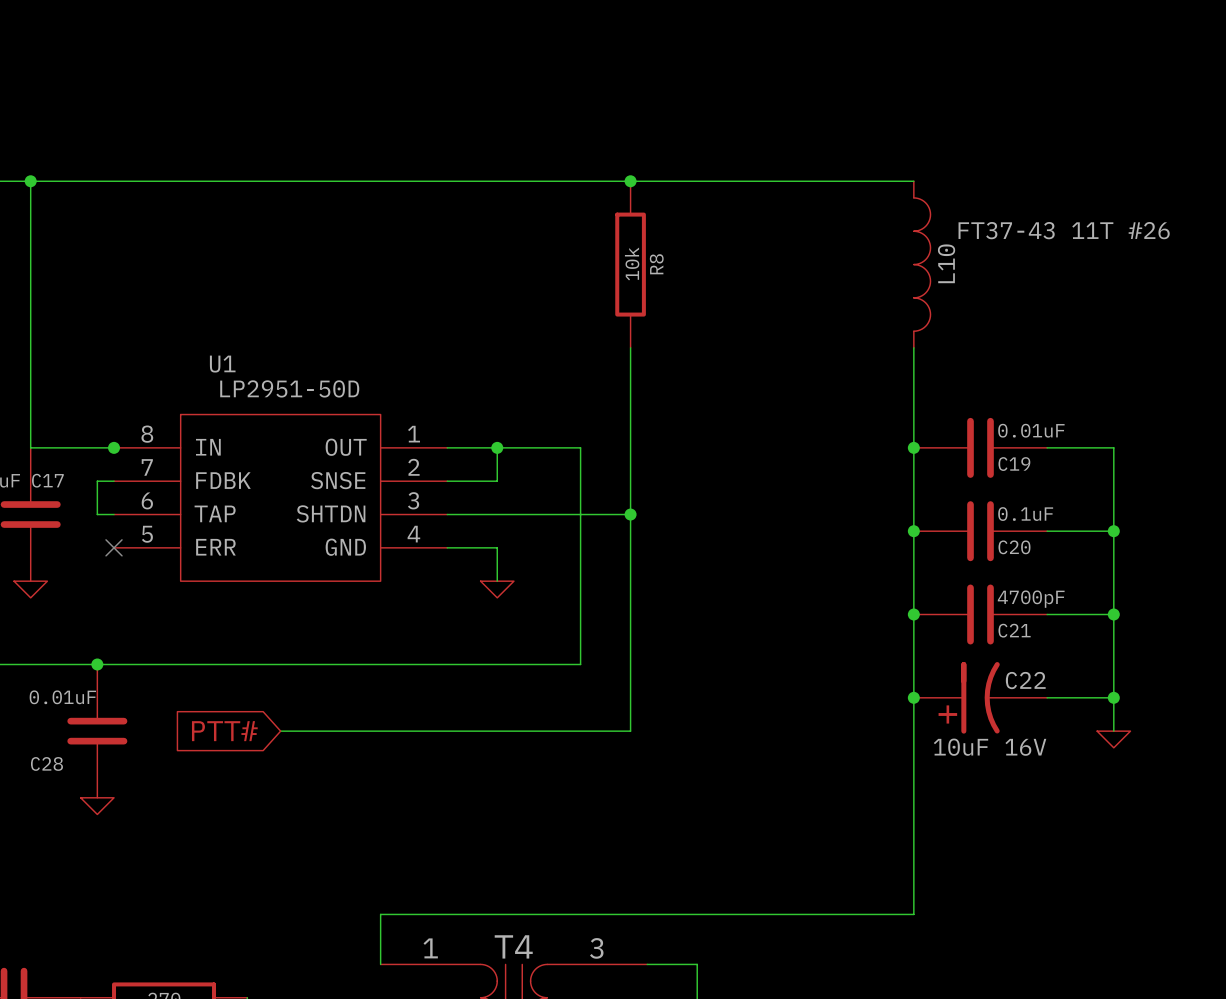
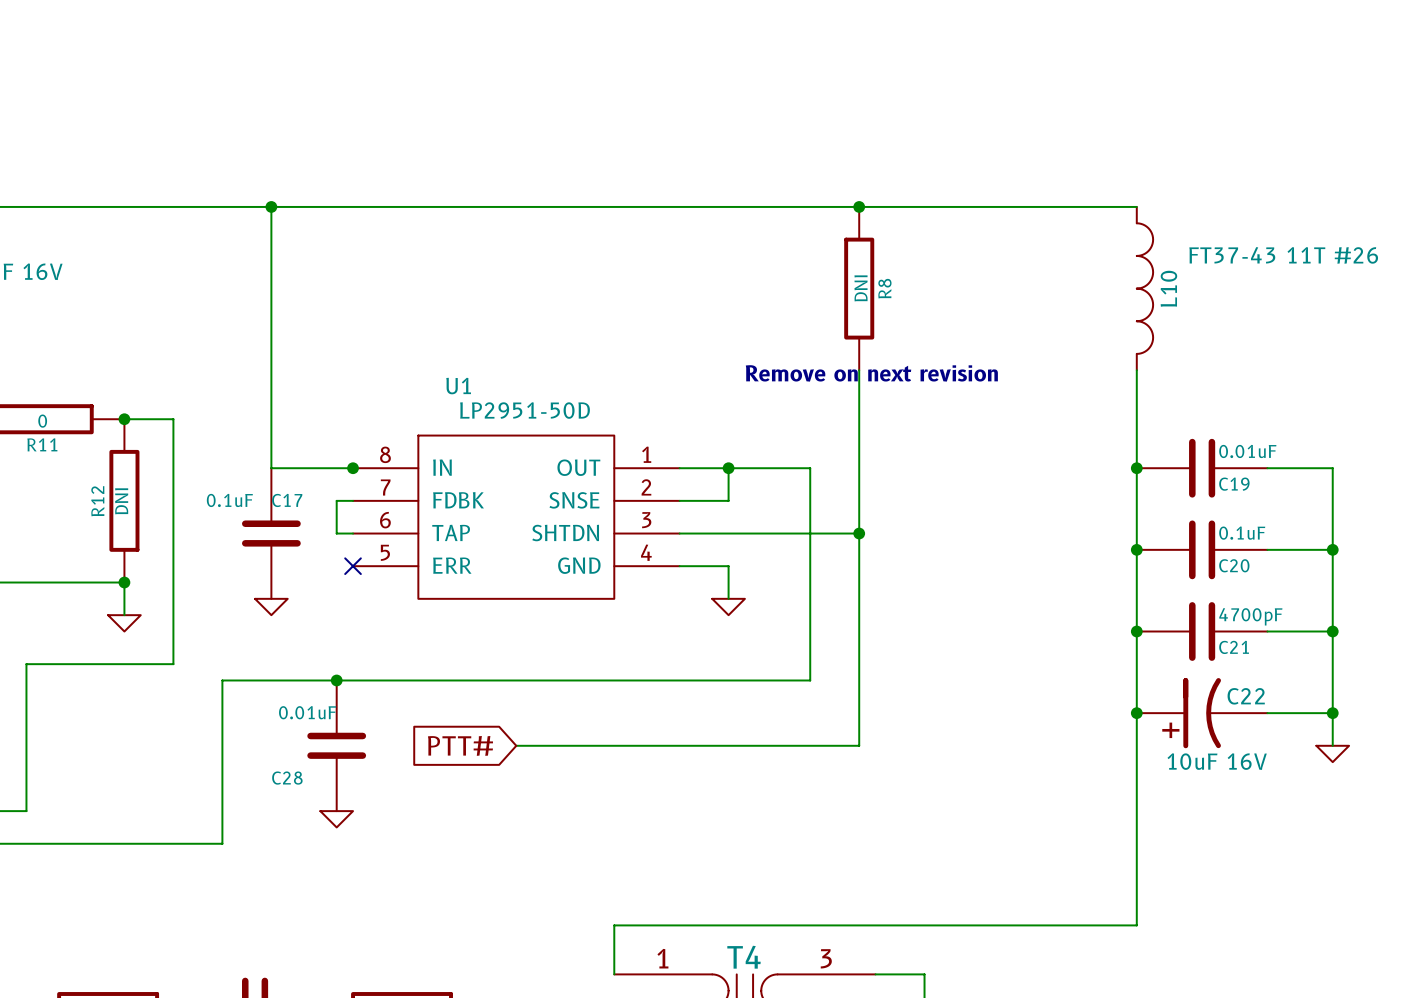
R8 value: 10k (632, 263) -> DNI (861, 288)
text: none -> Remove on next revision (871, 373)

